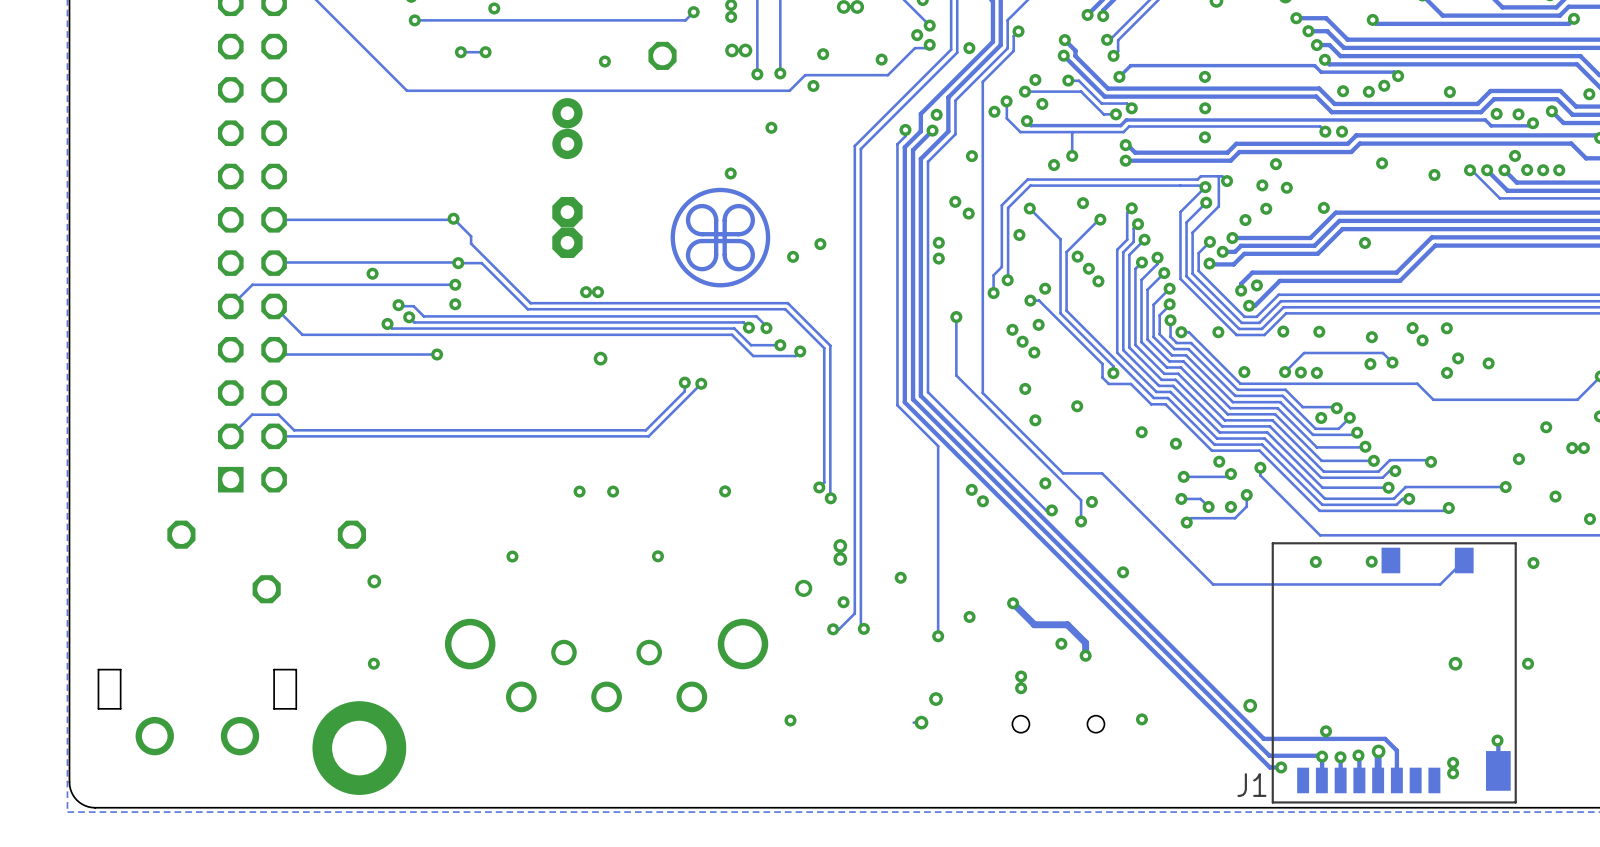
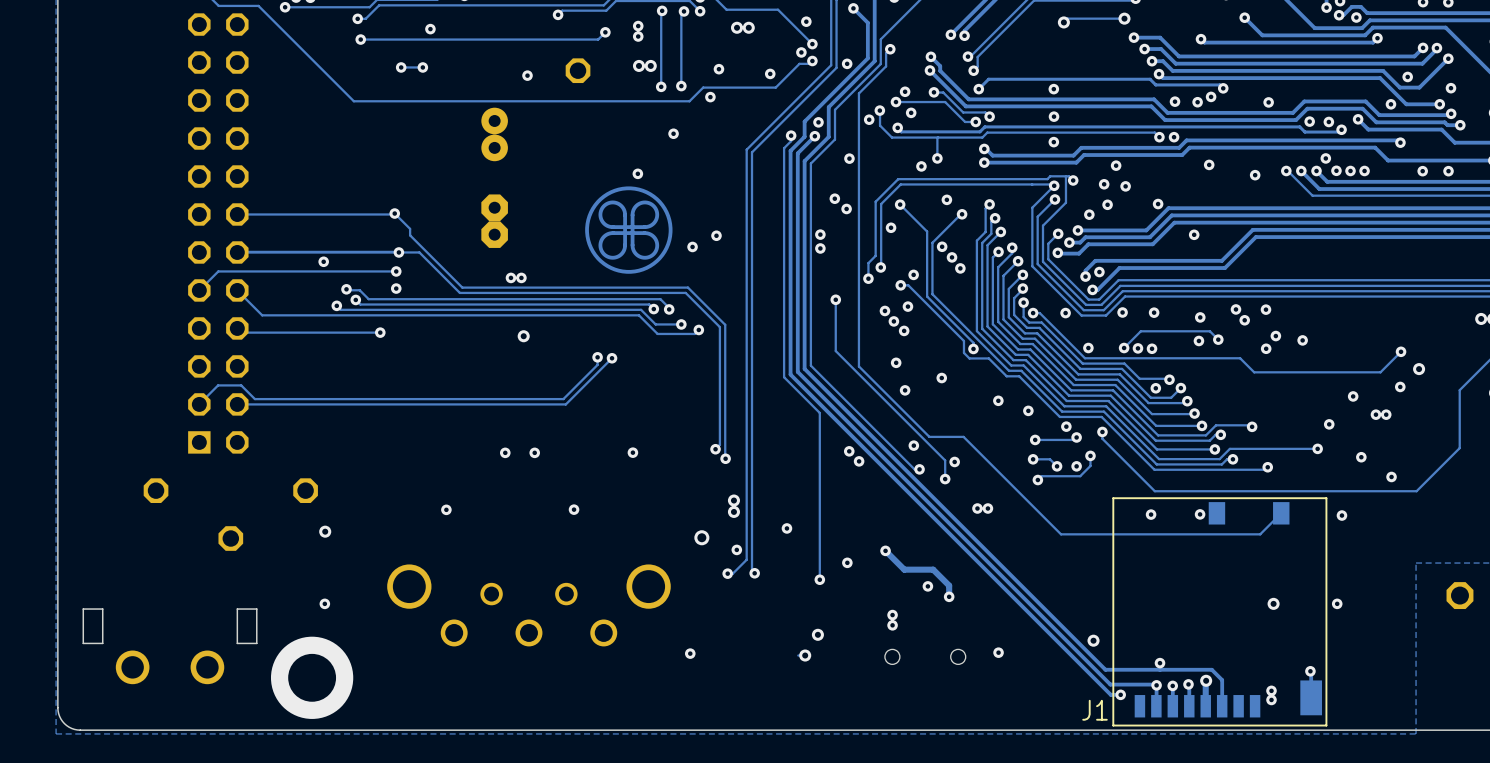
via: none -> (977, 508)
via: none -> (987, 508)
via: (1123, 572) -> none

